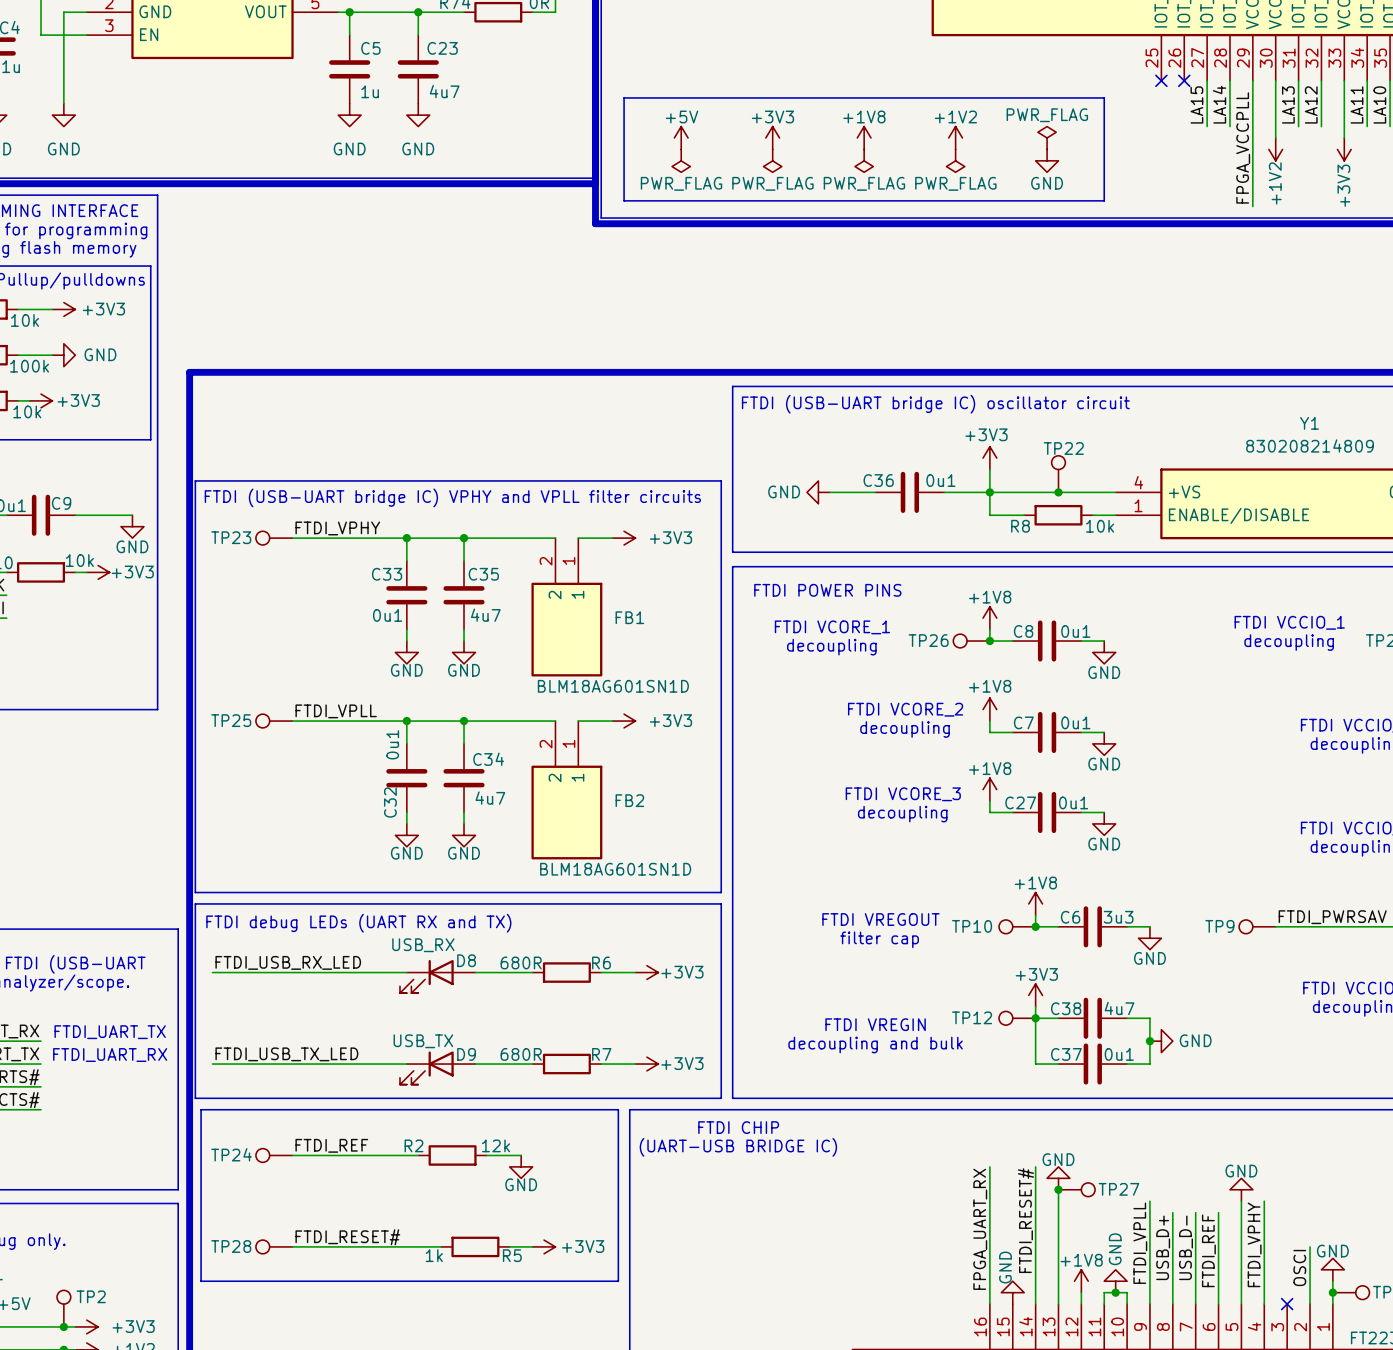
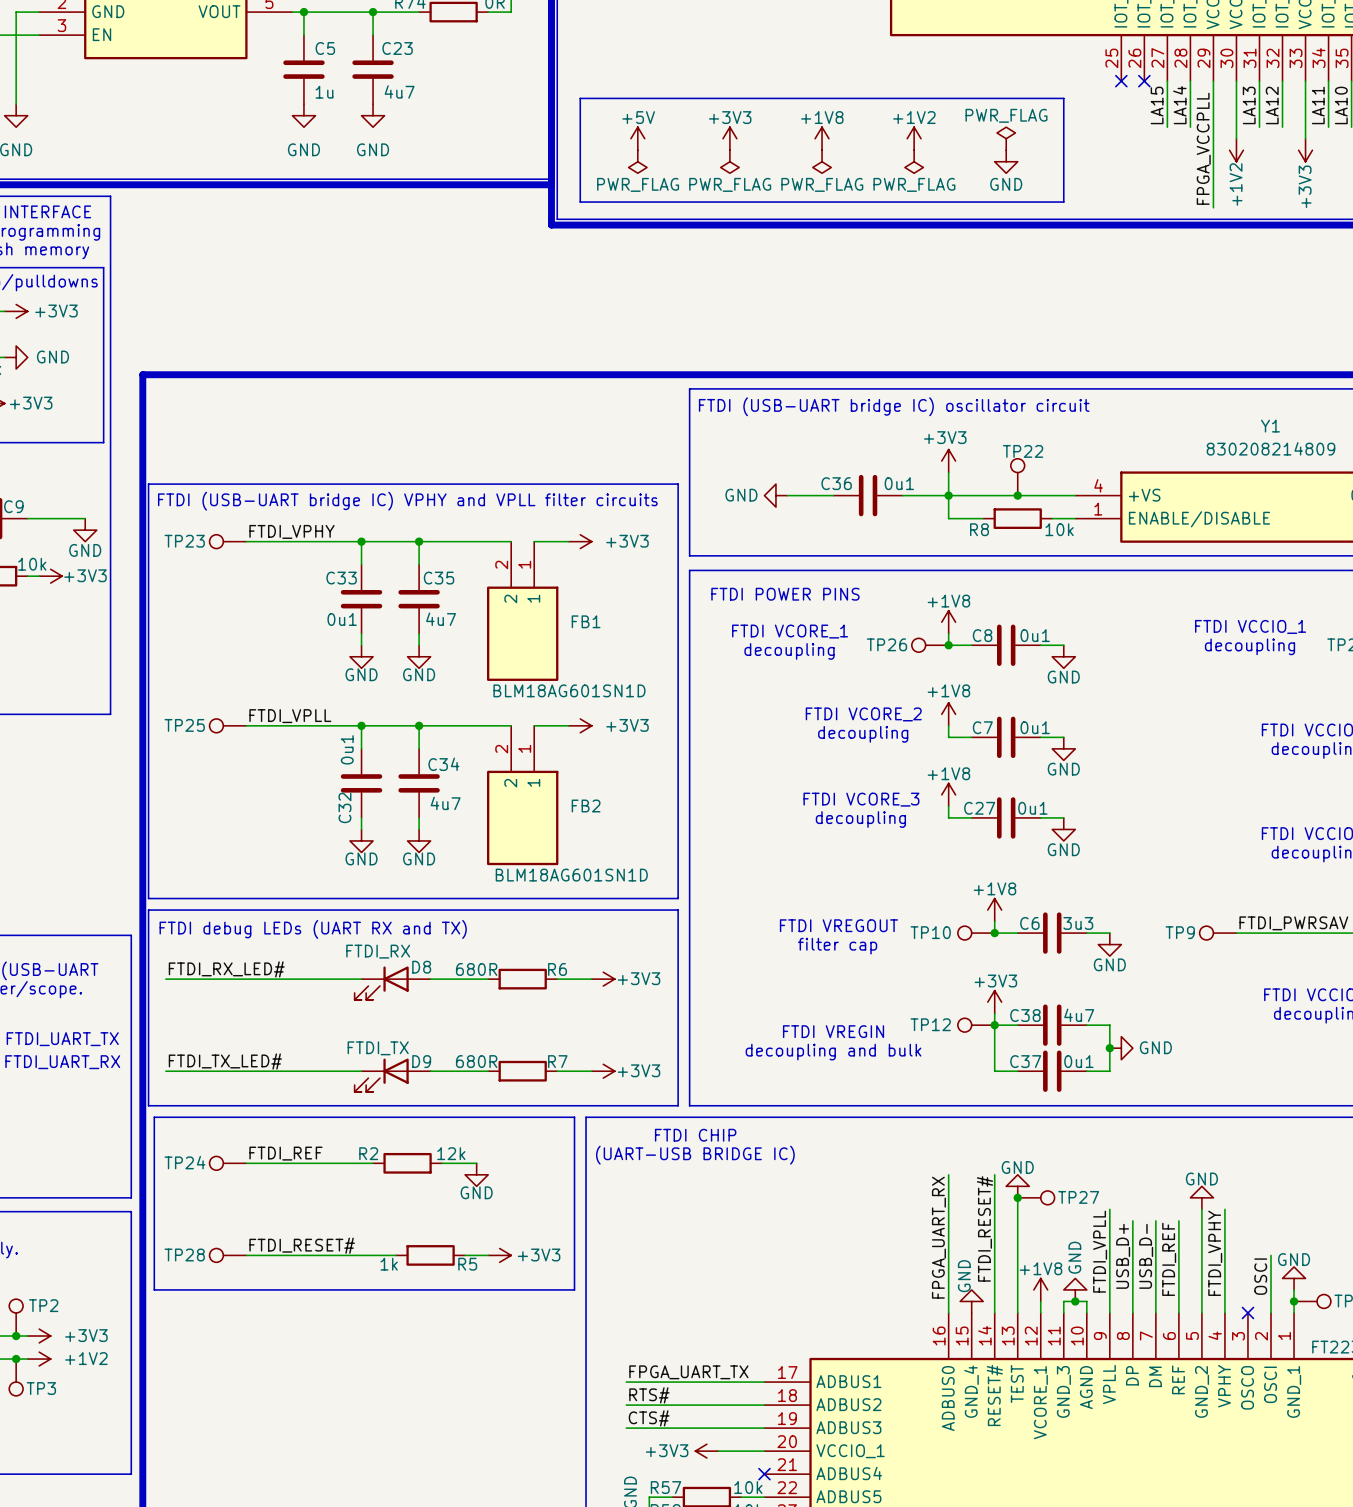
D8 value: USB_RX (423, 945) -> FTDI_RX (378, 951)
label: FTDI_USB_RX_LED (288, 962) -> FTDI_RX_LED# (226, 969)
D9 value: USB_TX (423, 1041) -> FTDI_TX (378, 1048)
label: FTDI_USB_TX_LED (286, 1054) -> FTDI_TX_LED# (225, 1061)

